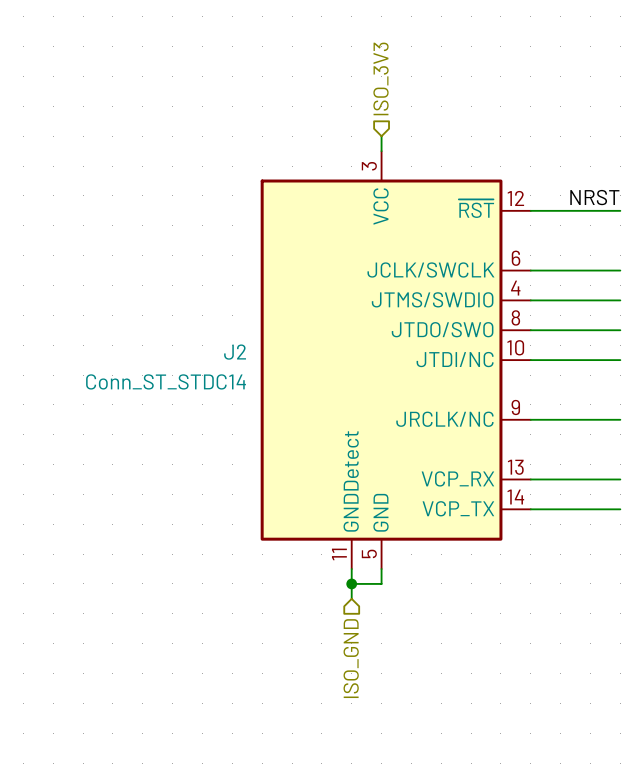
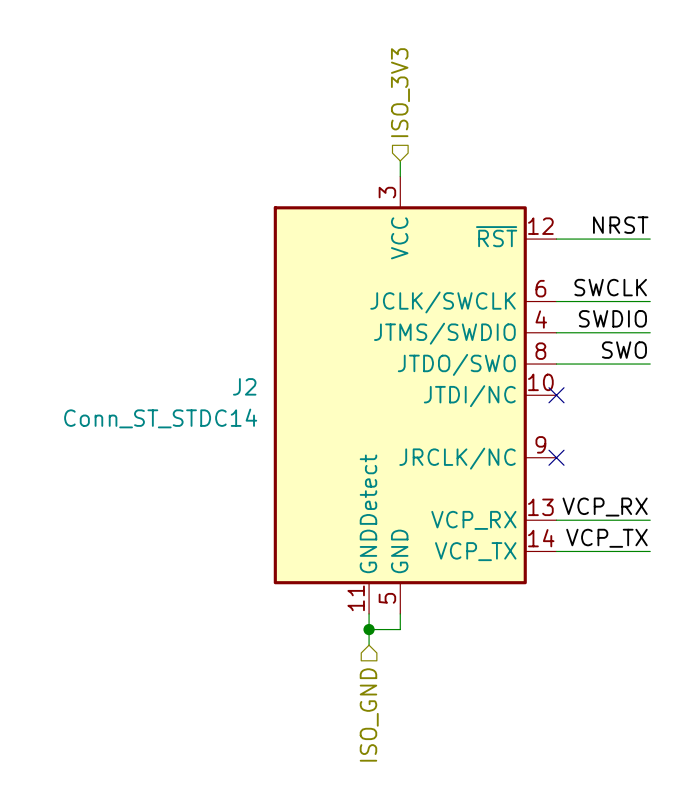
label: none -> SWCLK (610, 287)
label: none -> SWDIO (612, 318)
label: none -> SWO (624, 350)
wire: (530, 360) (620, 360) -> none
no-connect mark: none -> (556, 395)
wire: (530, 419) (620, 419) -> none
no-connect mark: none -> (556, 457)
label: none -> VCP_RX (605, 507)
label: none -> VCP_TX (606, 538)

